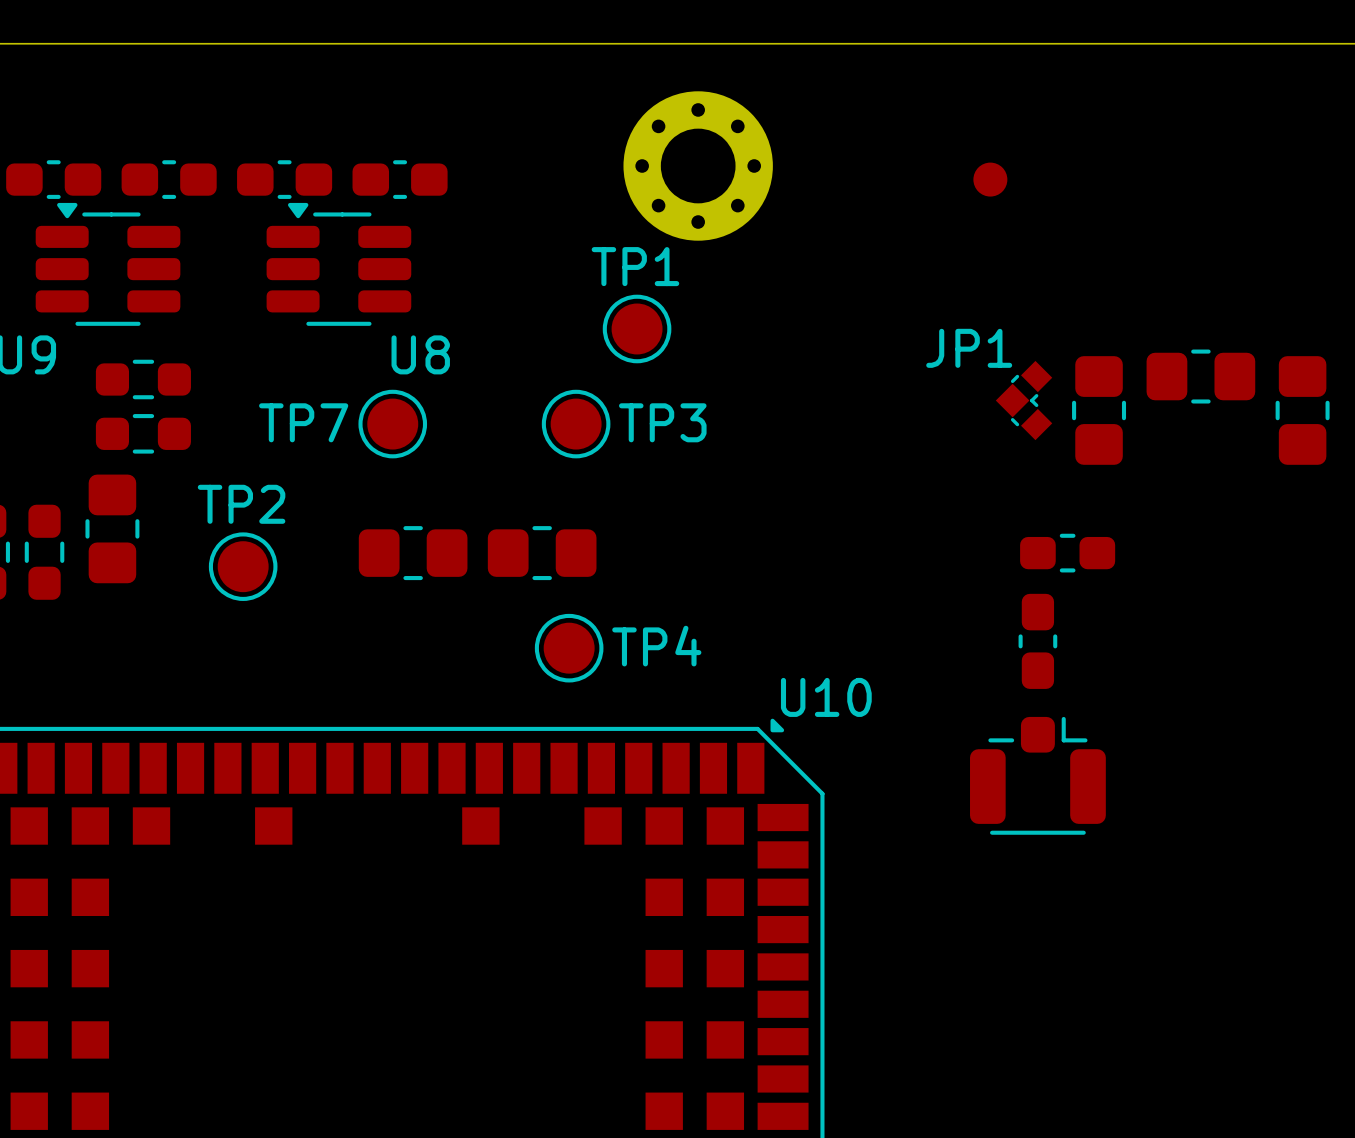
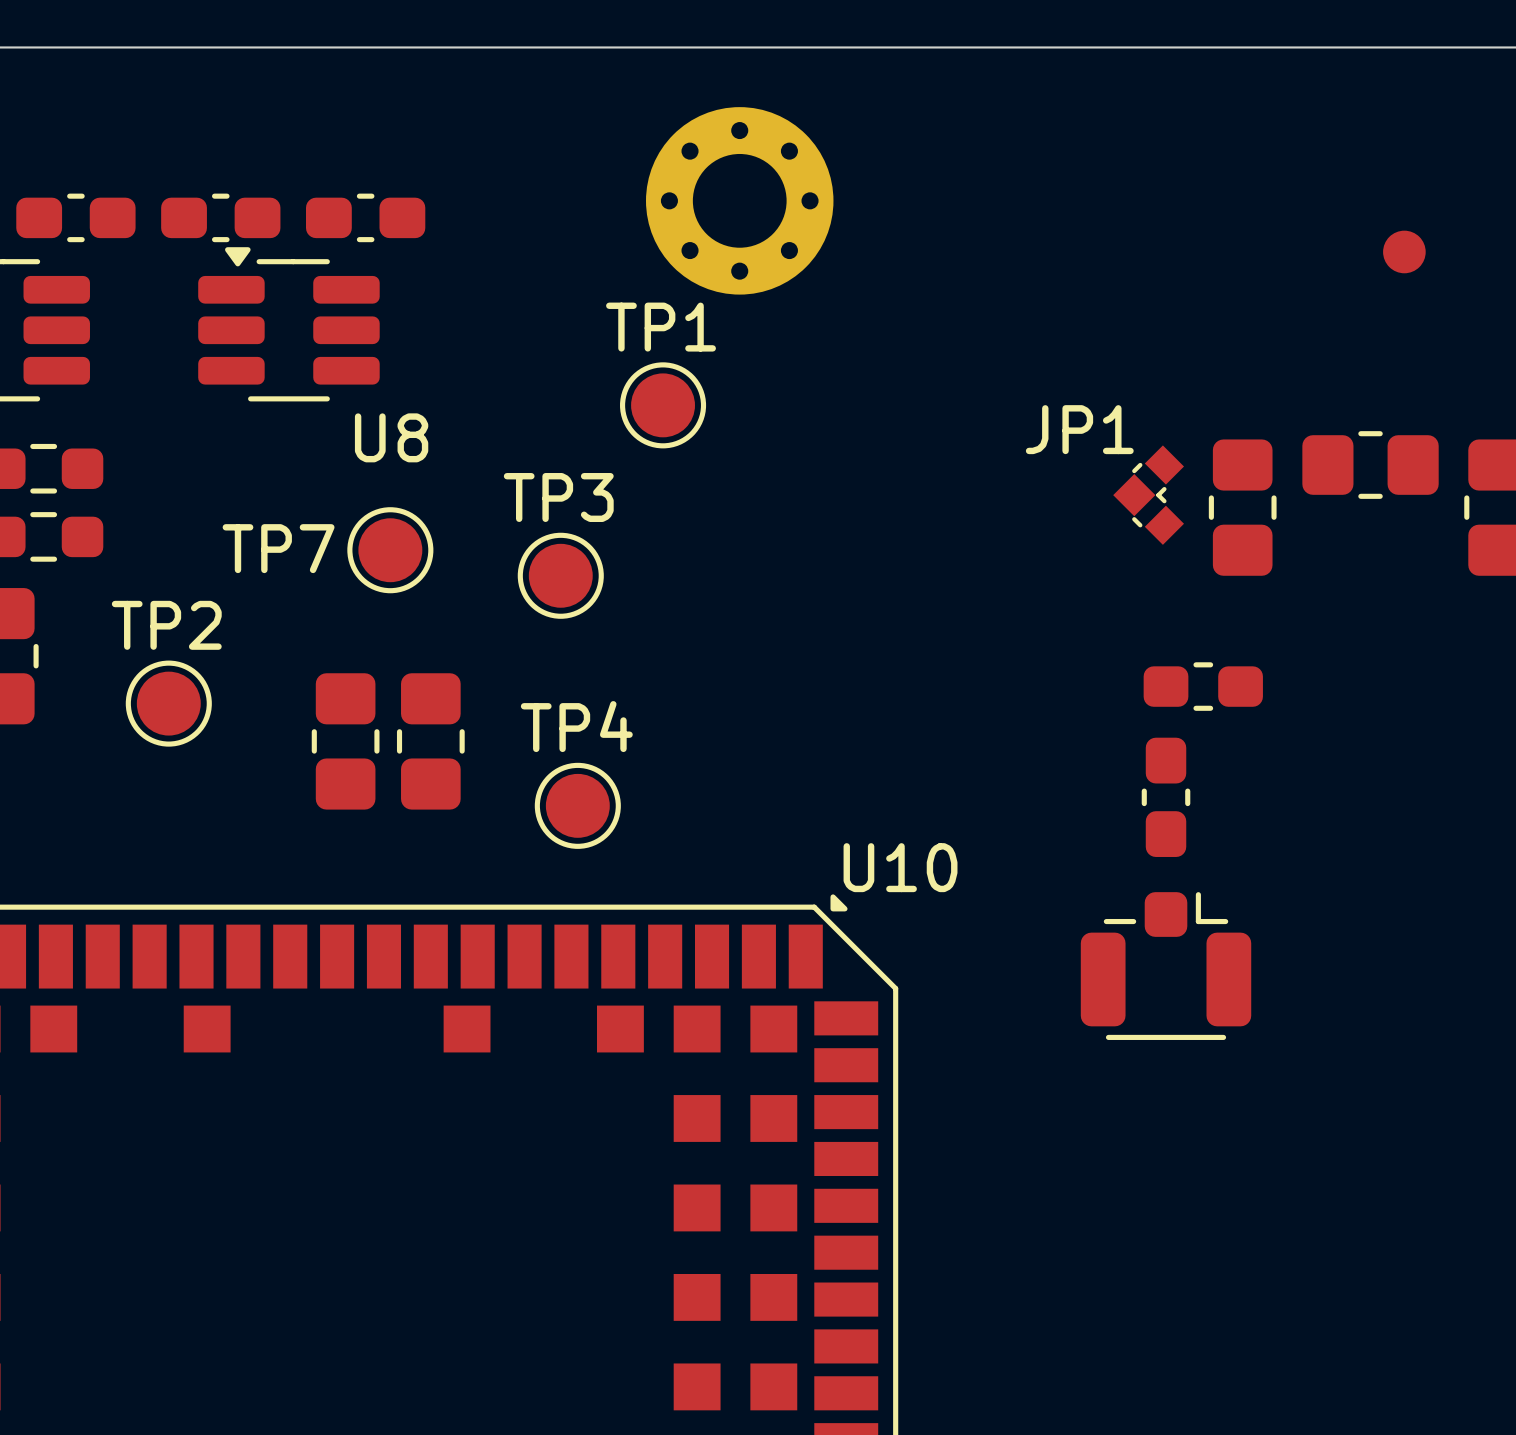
part position: (990, 179) -> (1404, 251)
TP3 name position: TP3 (662, 422) -> TP3 (558, 497)
TP7 position: (392, 424) -> (390, 550)
TP3 position: (576, 424) -> (560, 575)
part: (413, 553) -> none
part: (542, 553) -> none
part: none -> (345, 741)
part: none -> (430, 741)
TP4 name position: TP4 (656, 646) -> TP4 (576, 726)

